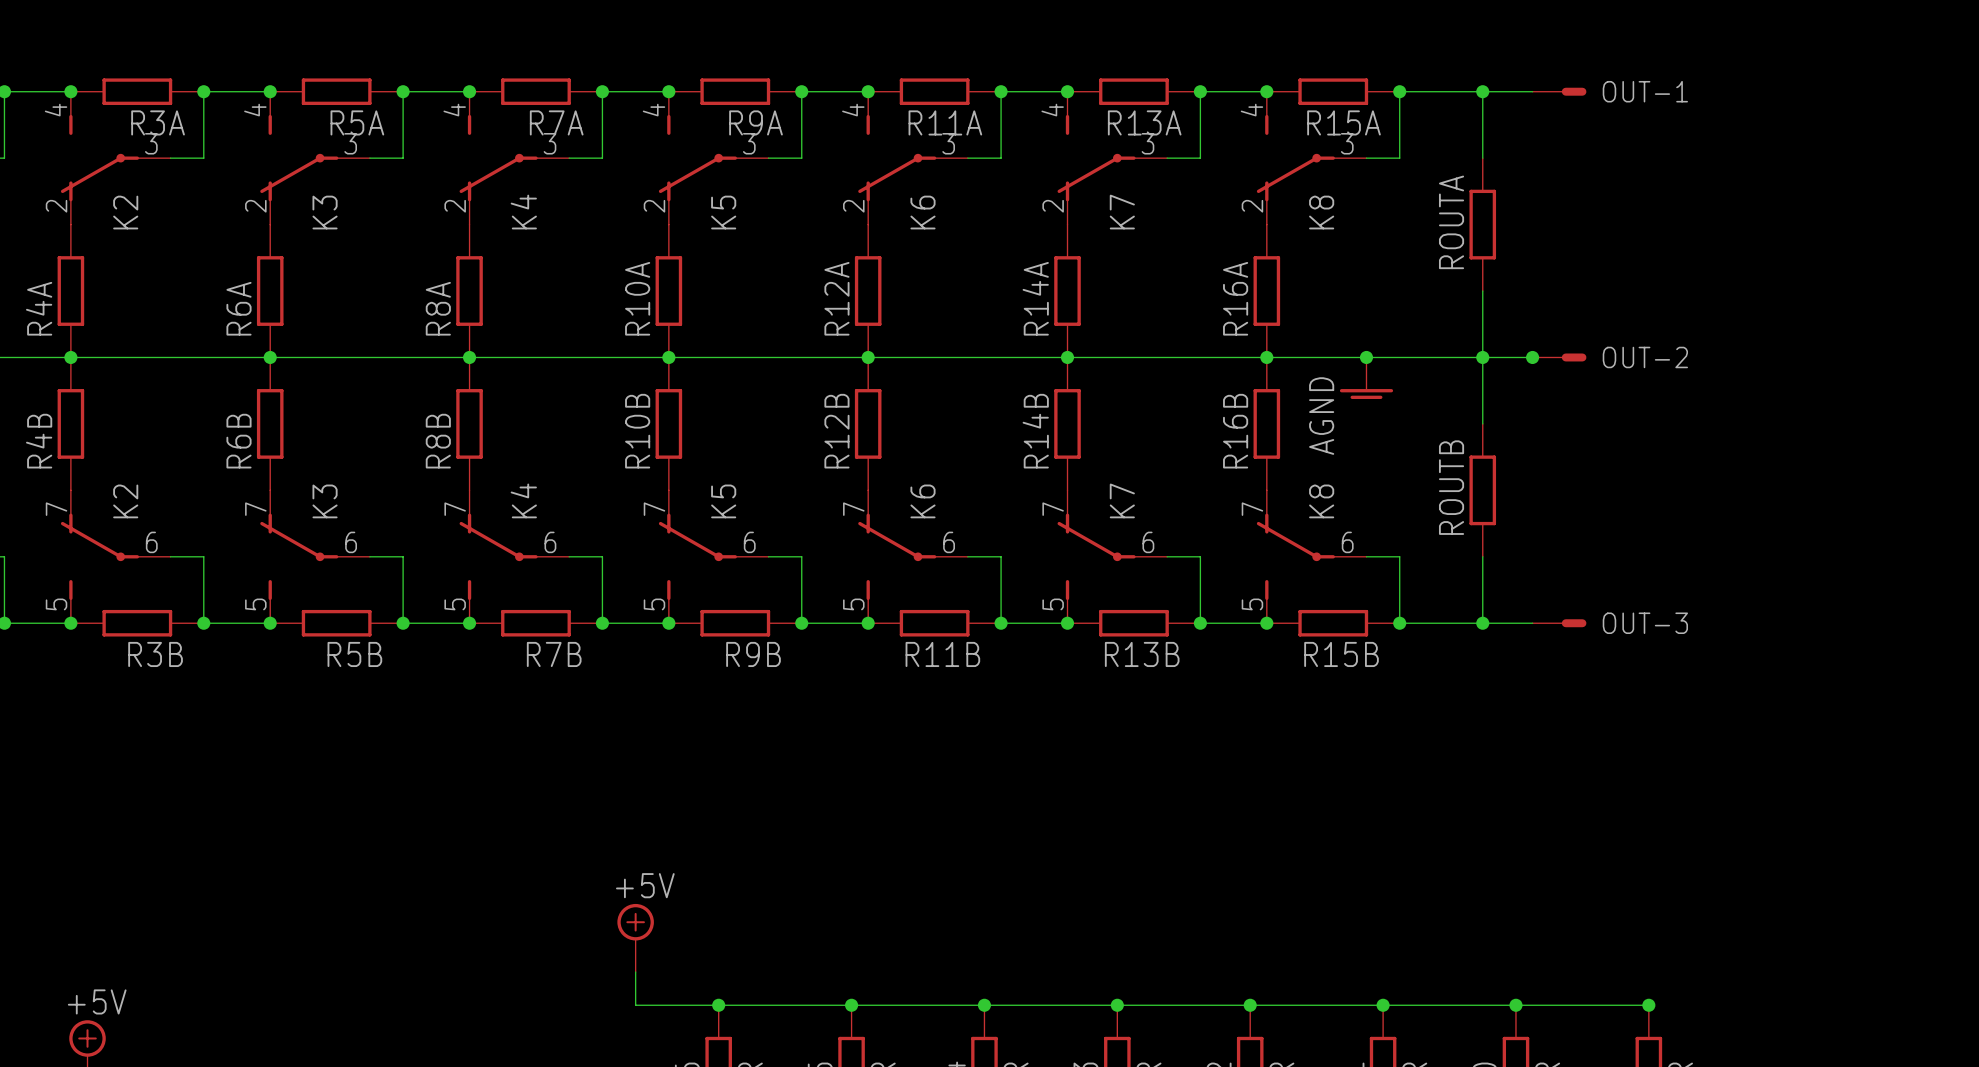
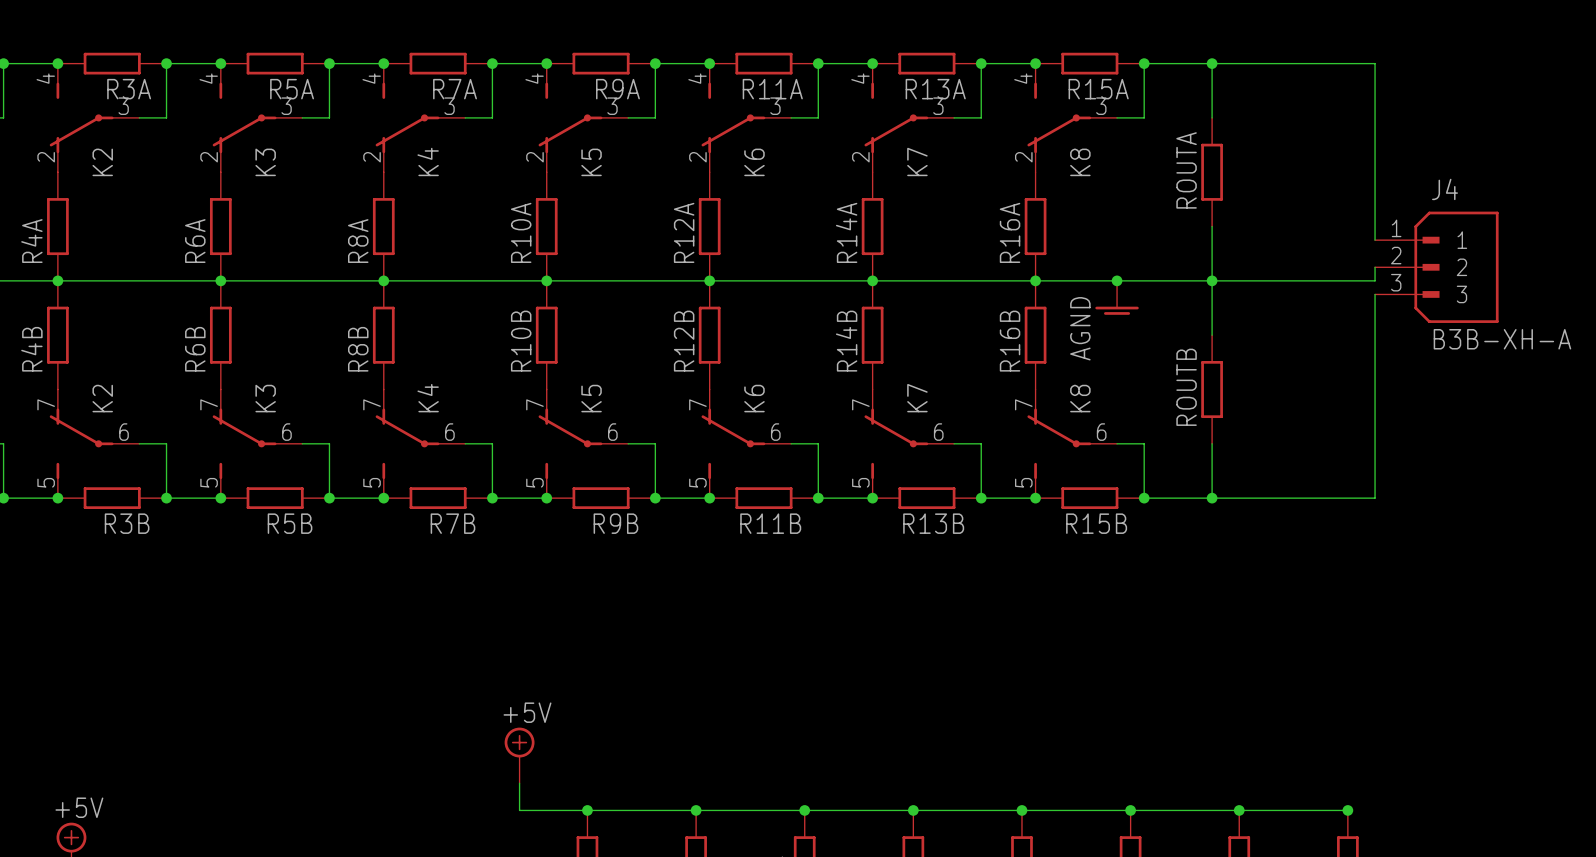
wire: none -> (1252, 63) (1375, 63) (1375, 240)
OUT-1: (1559, 91) -> none
wire: none -> (1375, 267) (1375, 280) (1252, 280)
J4: none -> B3B-XH-A (1436, 267)
junction: (1532, 357) -> none
OUT-2: (1559, 357) -> none
wire: none -> (1375, 294) (1375, 498) (1252, 498)
OUT-3: (1559, 623) -> none

